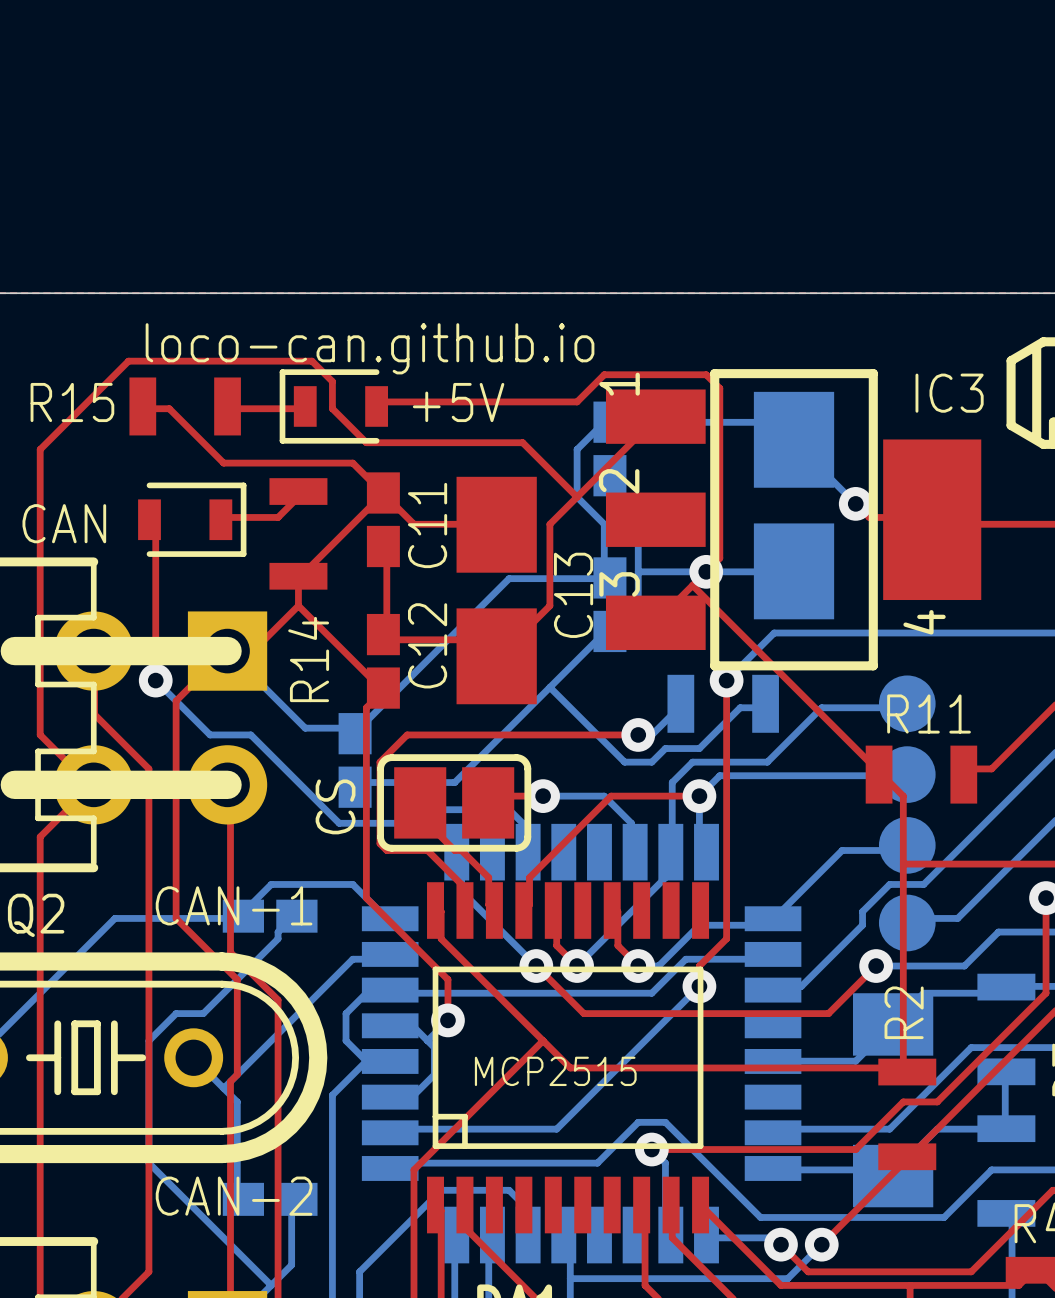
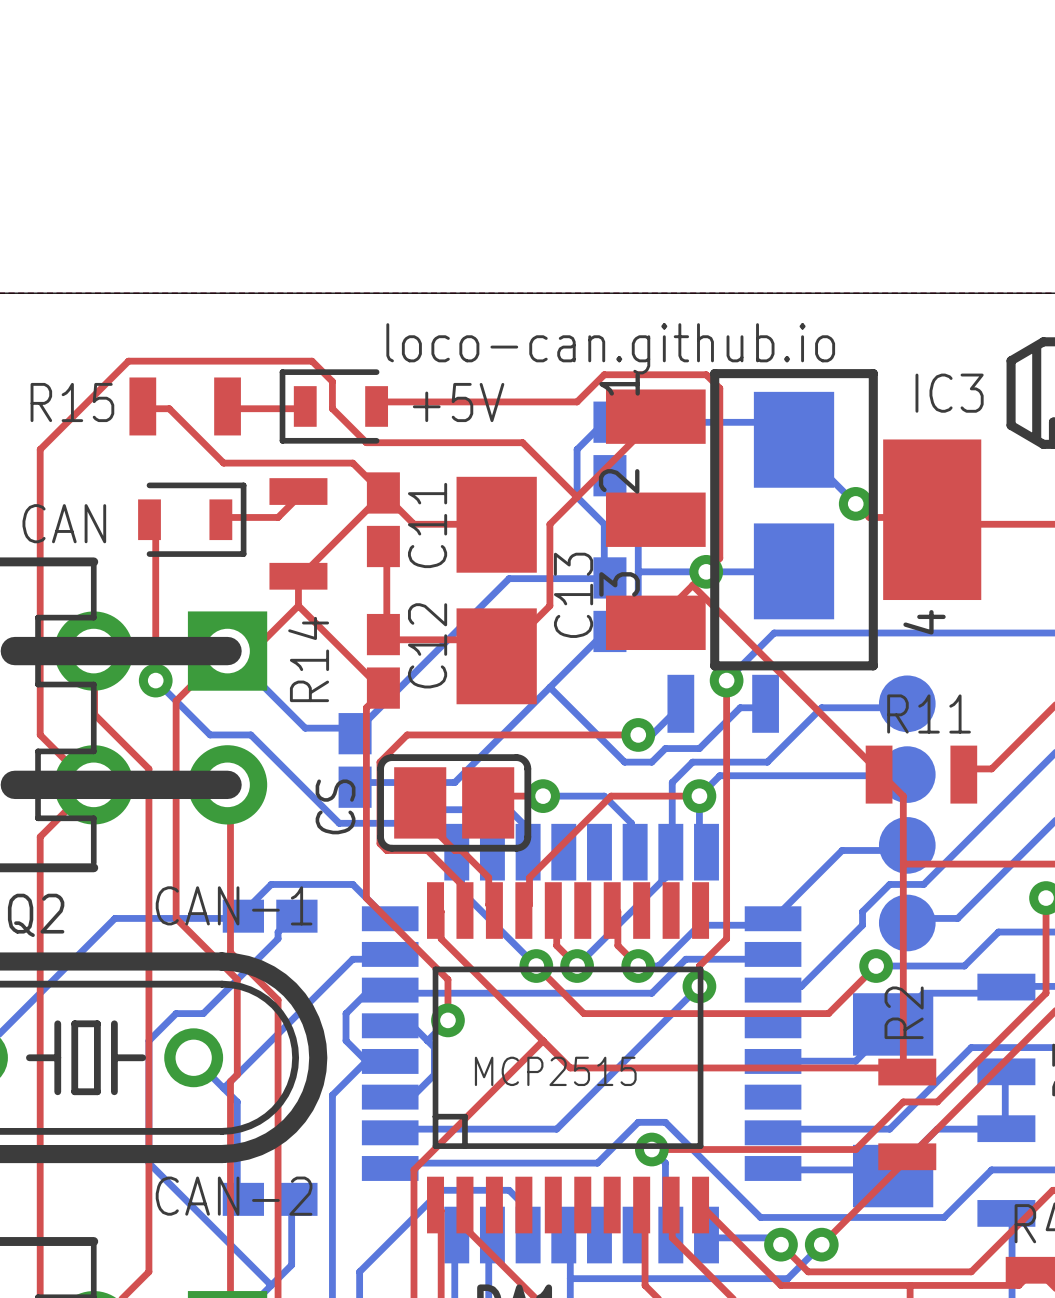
text position: loco-can.github.io (370, 348) -> loco-can.github.io (610, 348)

